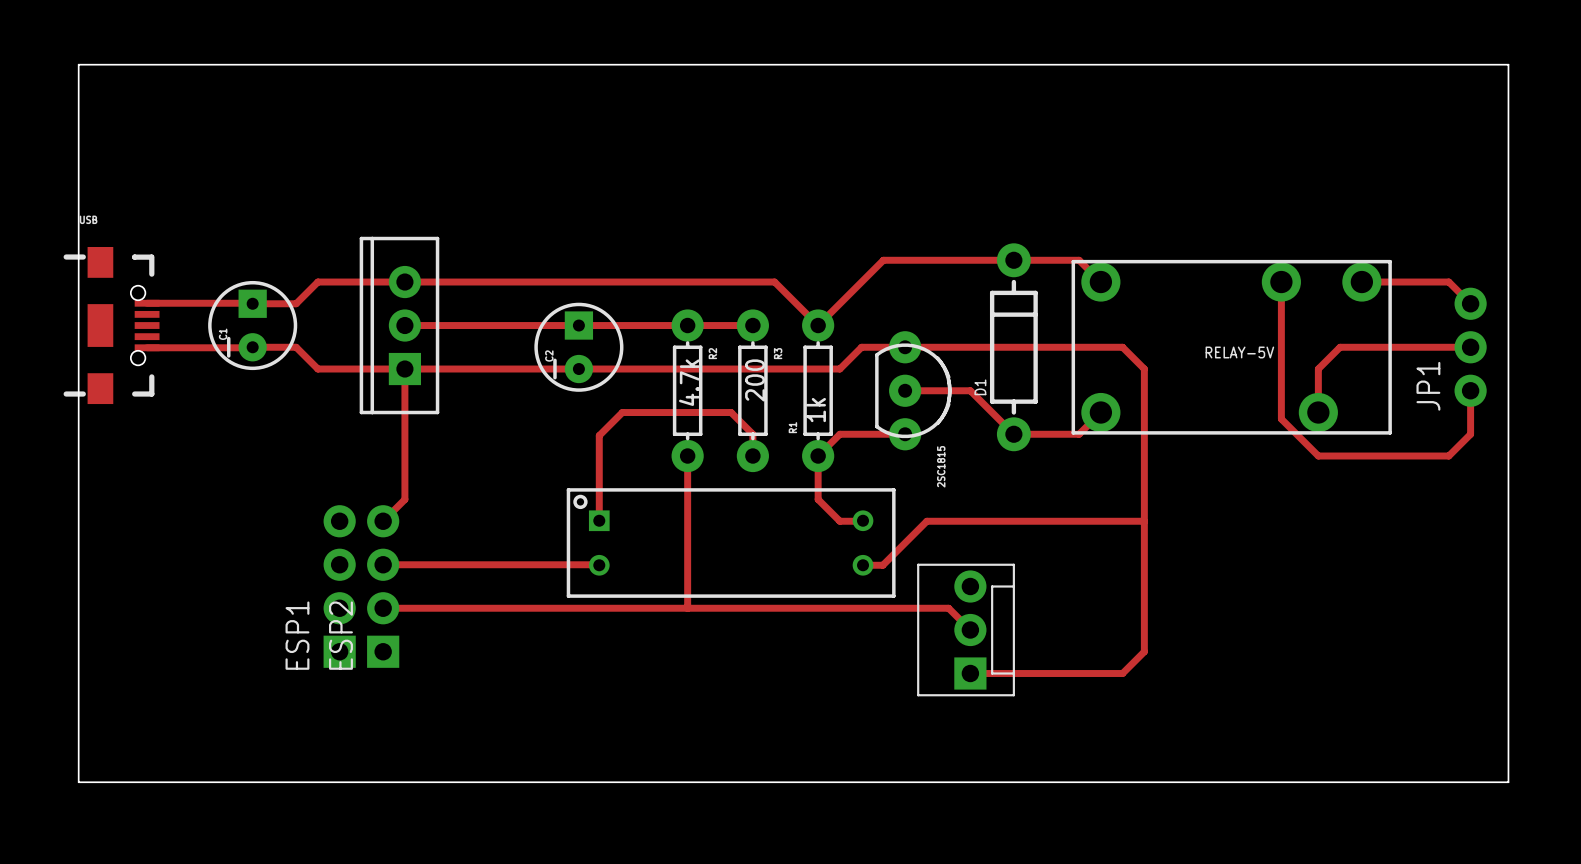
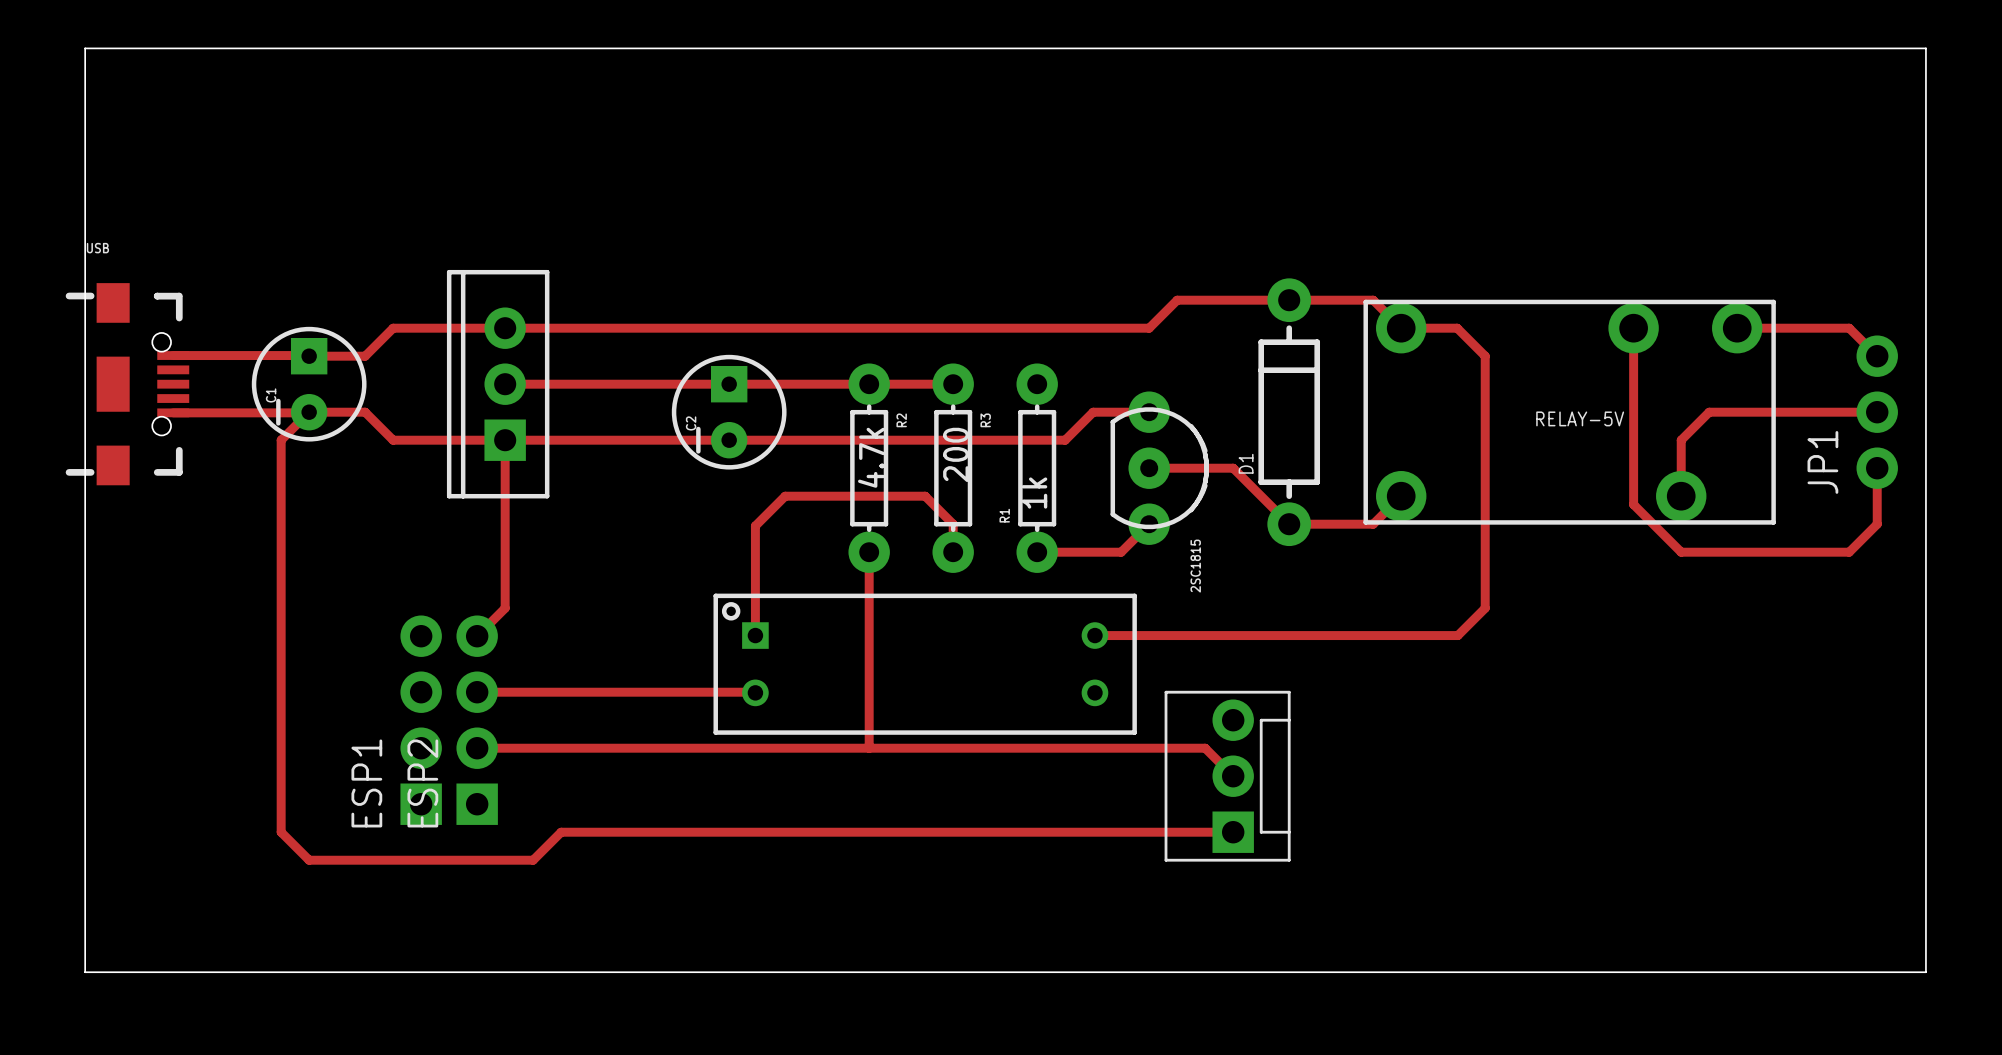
track: (926, 260) (883, 260) (818, 325) (774, 282) -> (1177, 300) (1149, 328) (981, 328)
track: none -> (1401, 328) (1457, 328) (1485, 356) (1485, 608) (1457, 635) (1094, 635)
track: (905, 347) (1122, 347) (1144, 369) (1144, 651) (1122, 673) (970, 673) -> (308, 412) (281, 440) (281, 832) (309, 860) (533, 860) (561, 832) (1233, 832)
track: (905, 434) (839, 434) (818, 456) (818, 499) (839, 521) (863, 520) -> (1149, 524) (1121, 552) (1037, 552)
track: (1144, 521) (926, 521) (882, 565) (863, 565) -> none

